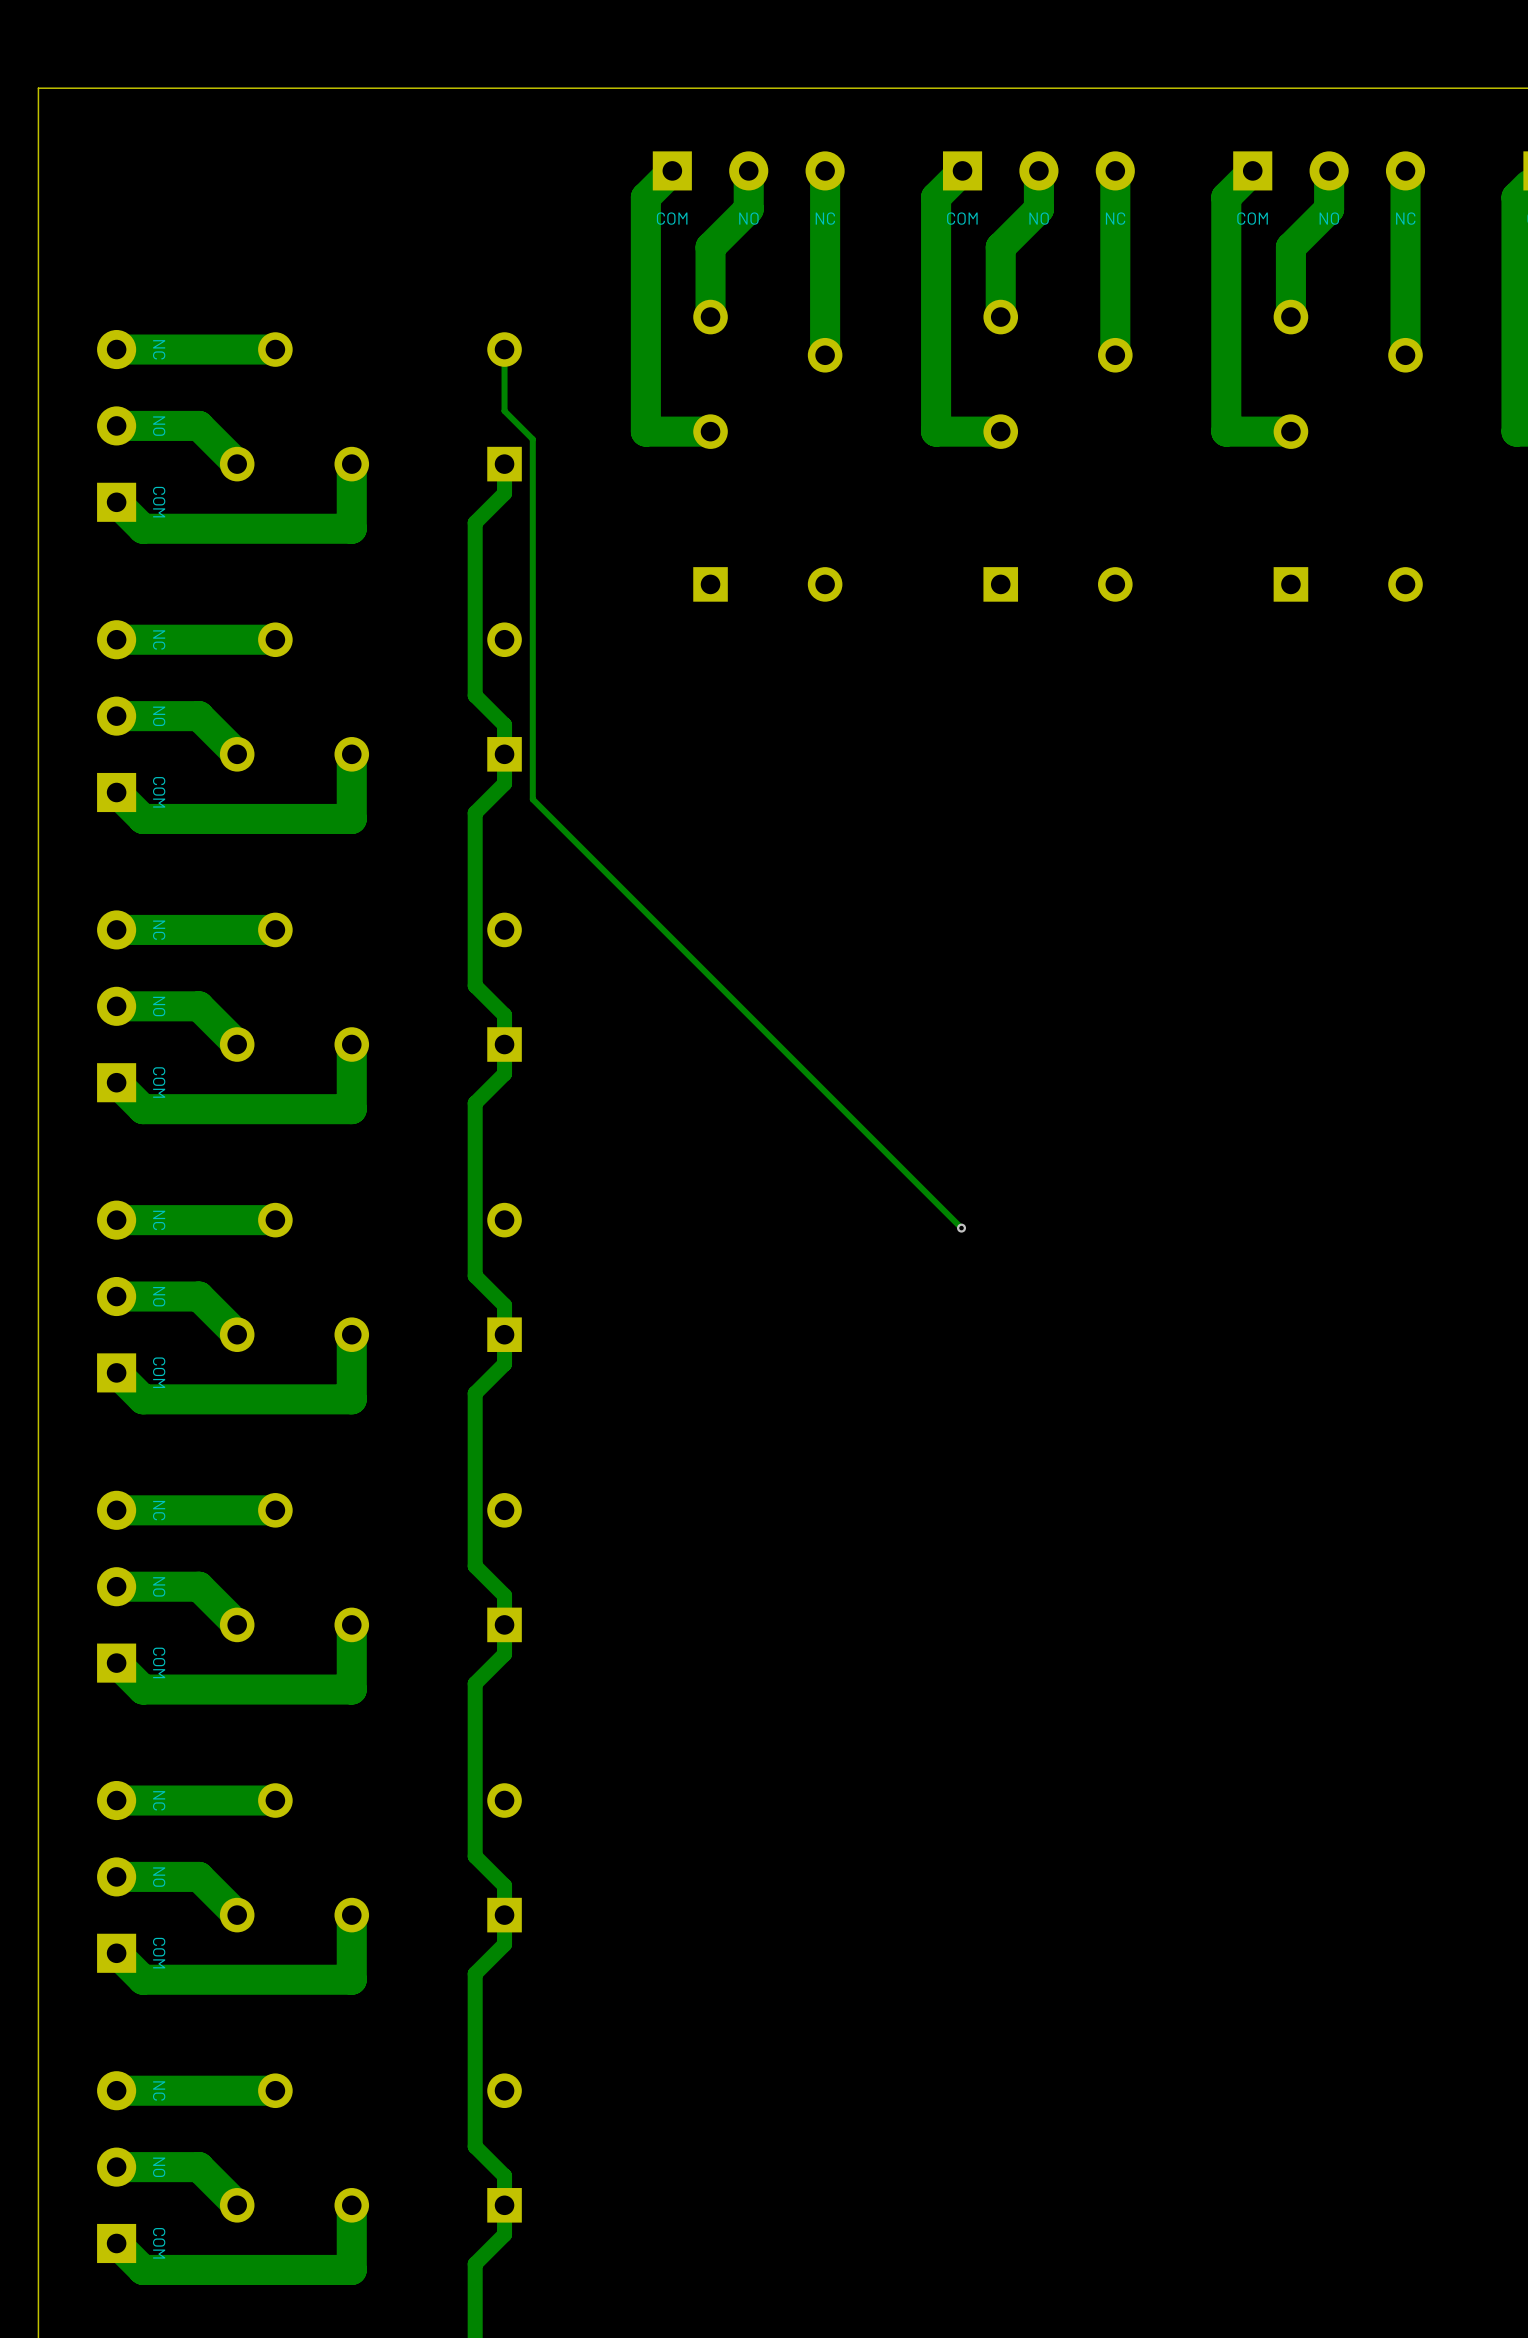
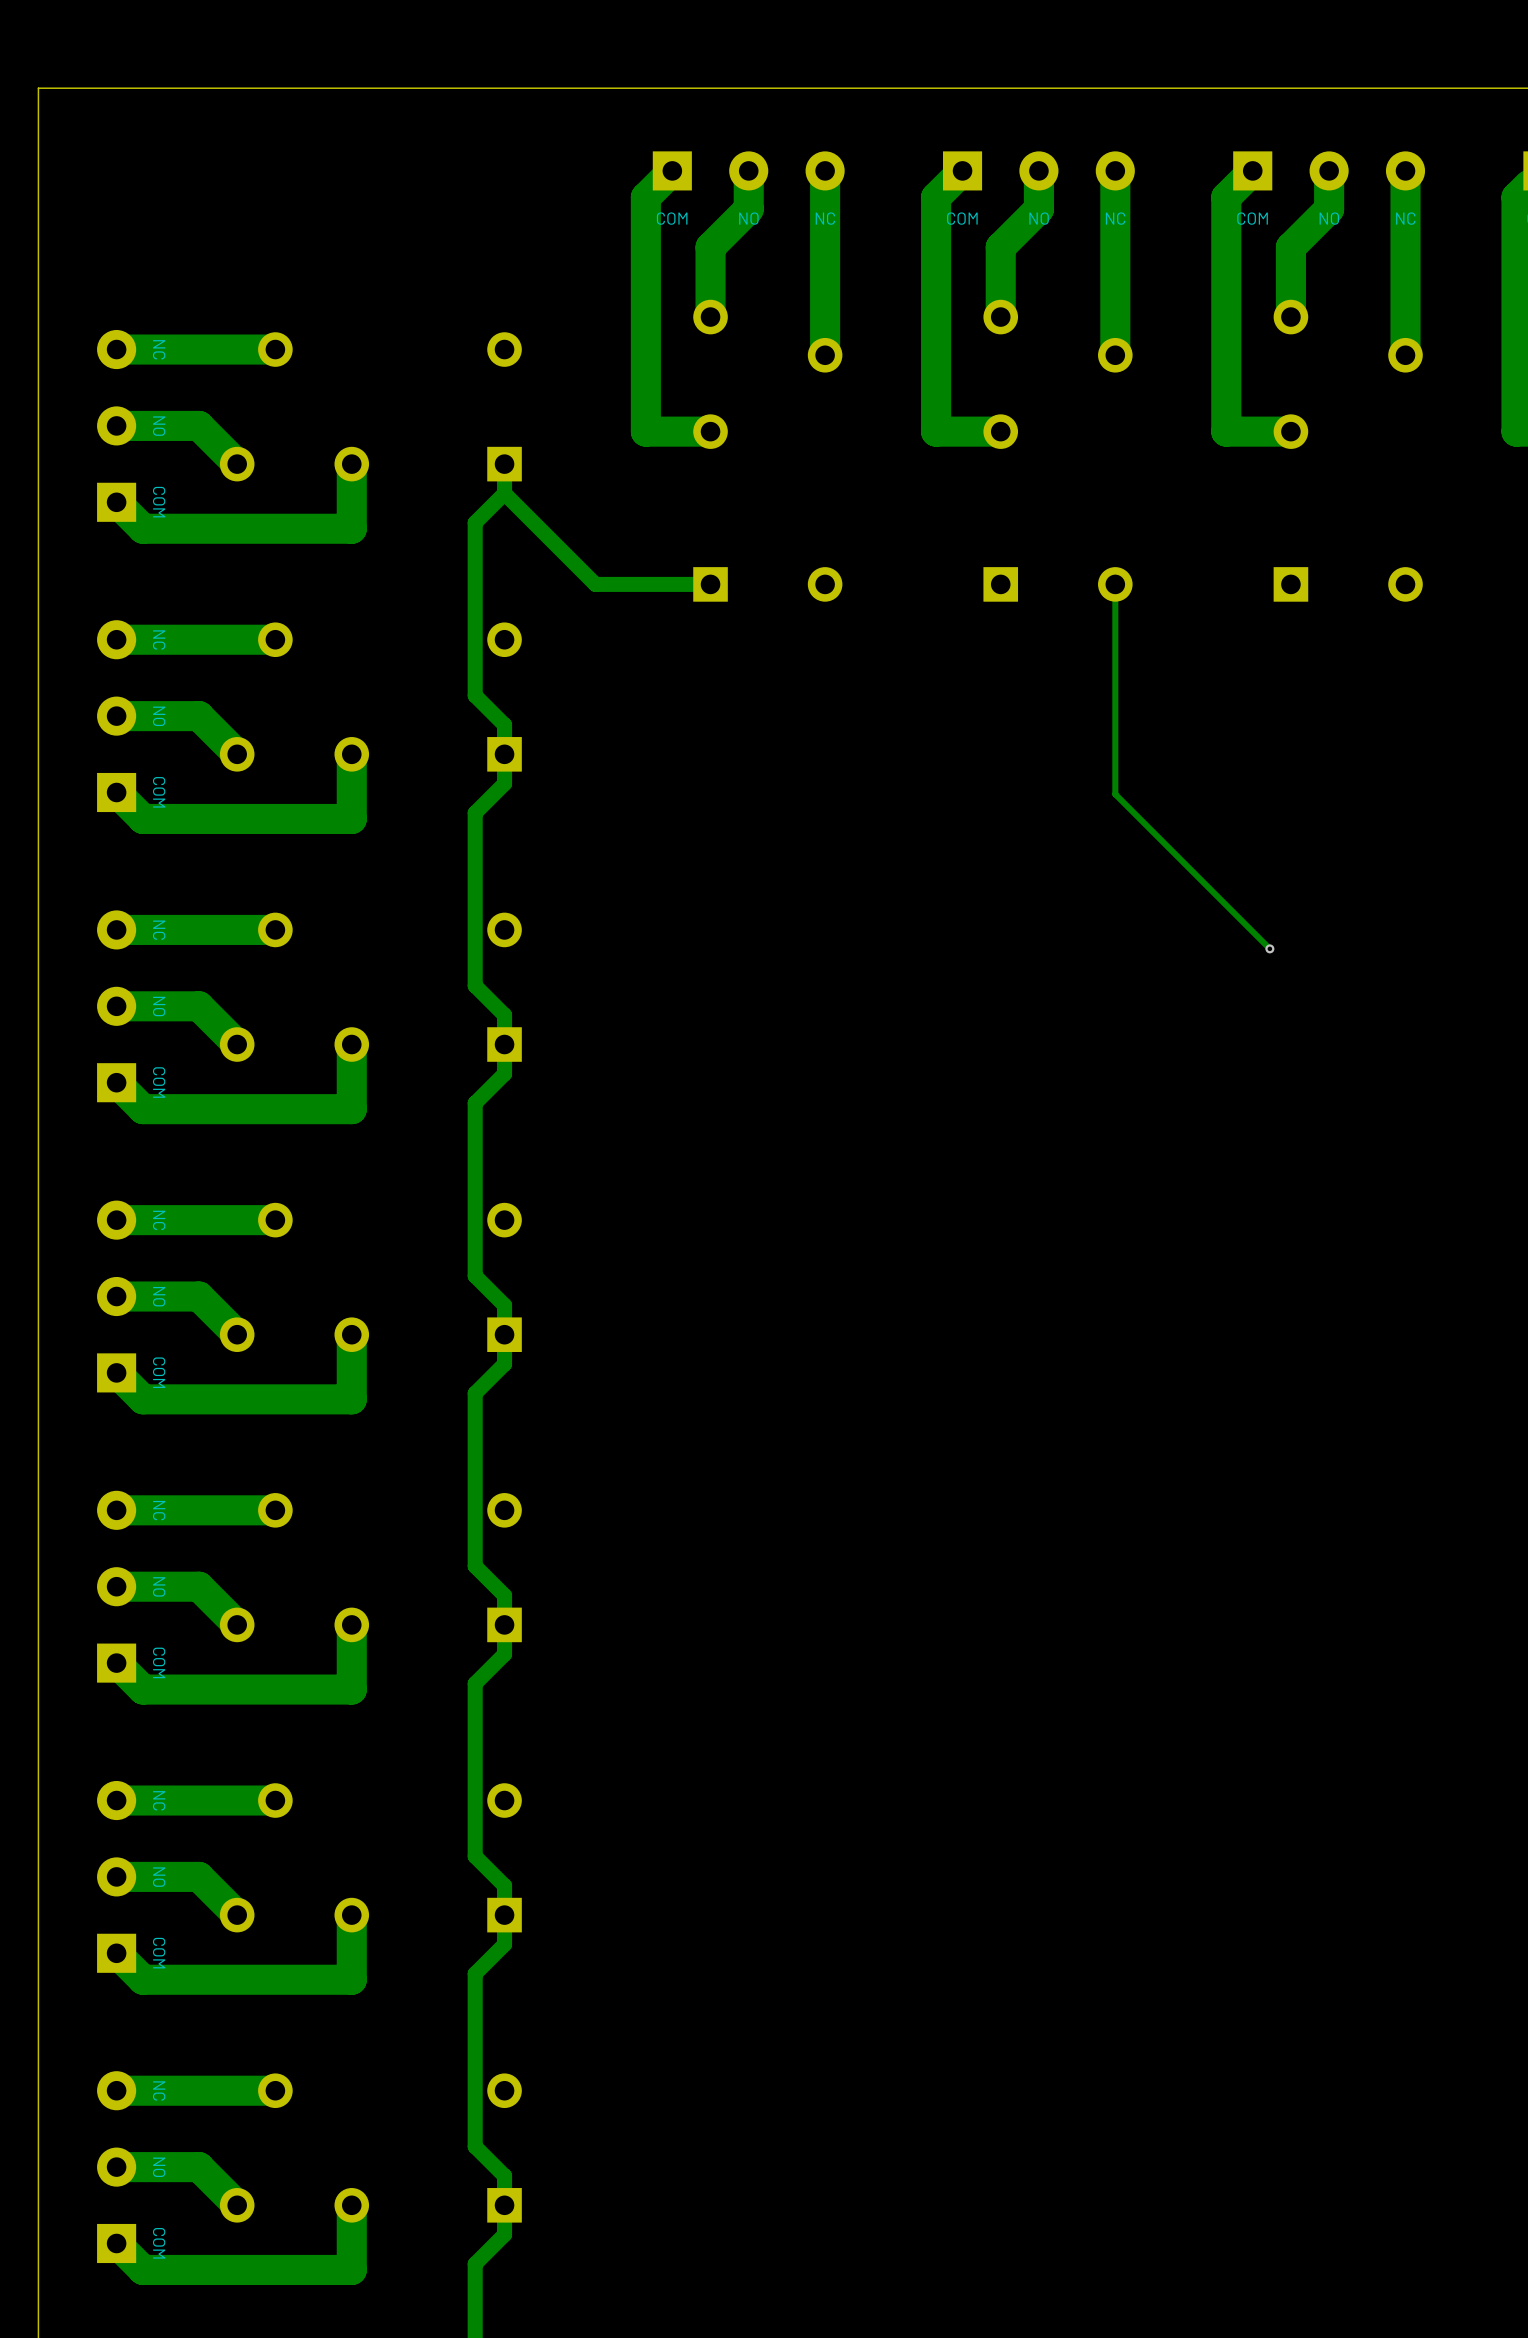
track: (504, 349) (504, 411) (532, 439) (532, 799) (961, 1228) -> none
track: none -> (504, 493) (595, 584) (710, 584)
track: none -> (1115, 584) (1115, 794) (1269, 948)
via: none -> (1269, 948)
via: (961, 1228) -> none

